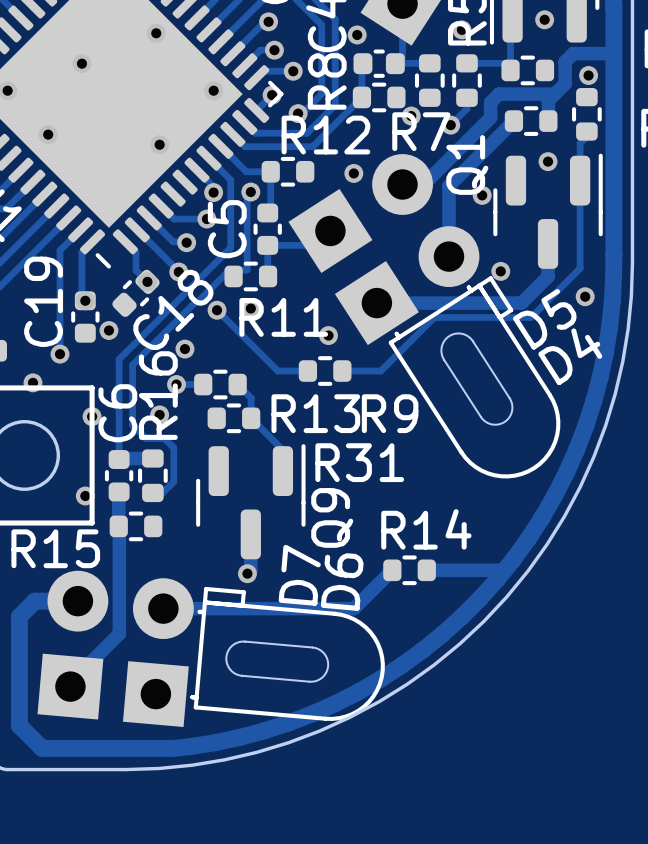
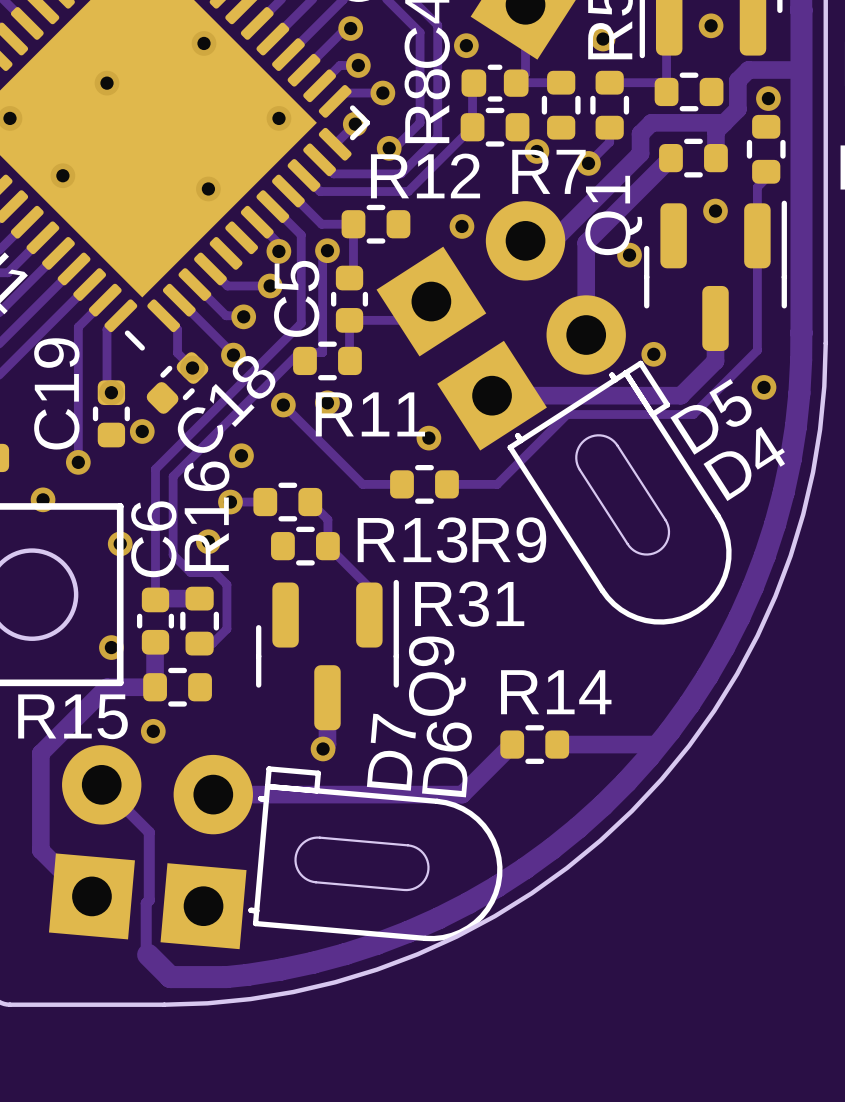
track: (118, 526) (119, 633) (66, 686) -> (155, 687) (107, 687) (40, 753) (40, 850) (86, 896)
via: none -> (153, 731)
track: (77, 601) (34, 601) (19, 616) (19, 725) (42, 748) (130, 748) -> (101, 784) (149, 832) (149, 900) (146, 903) (146, 952) (170, 977)

